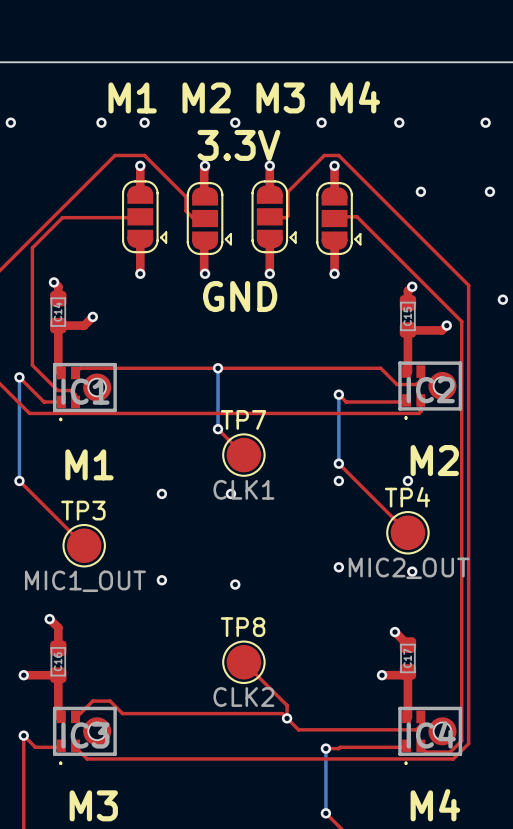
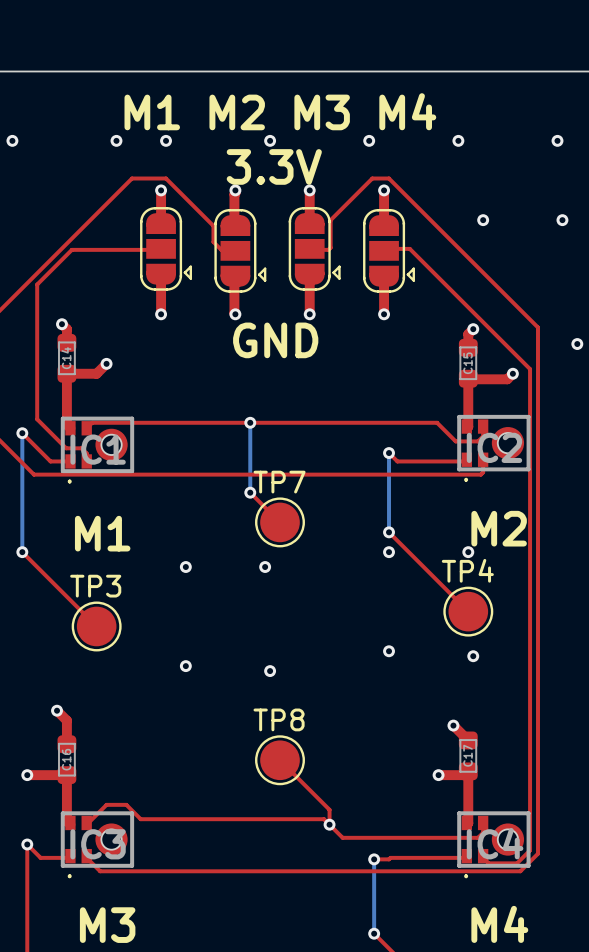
TP7 value: CLK1 (243, 489) -> none
TP4 value: MIC2_OUT (409, 568) -> none
TP3 value: MIC1_OUT (85, 581) -> none
TP8 value: CLK2 (243, 697) -> none

